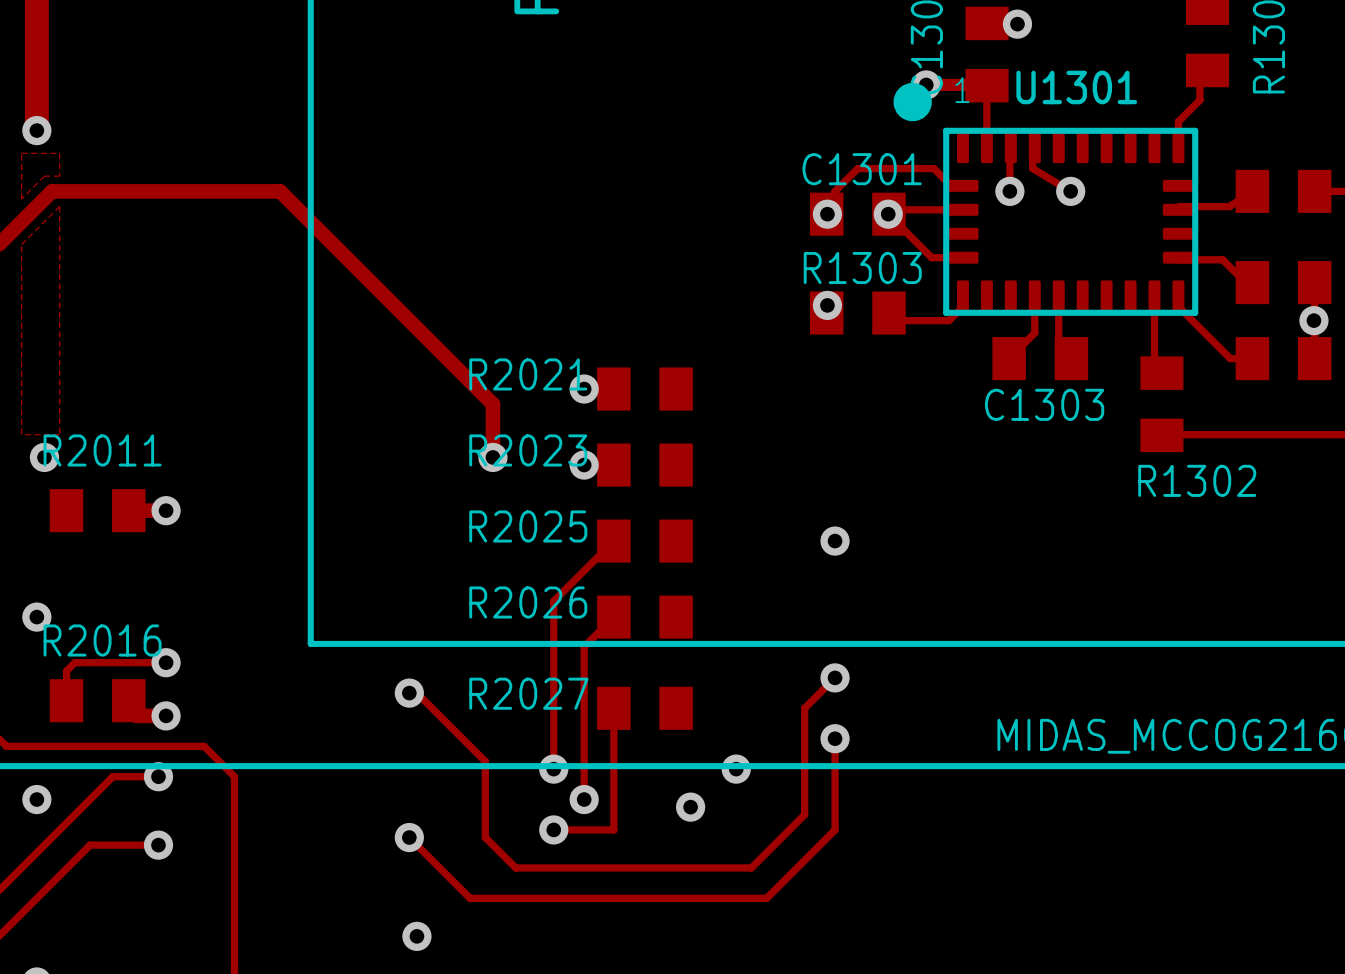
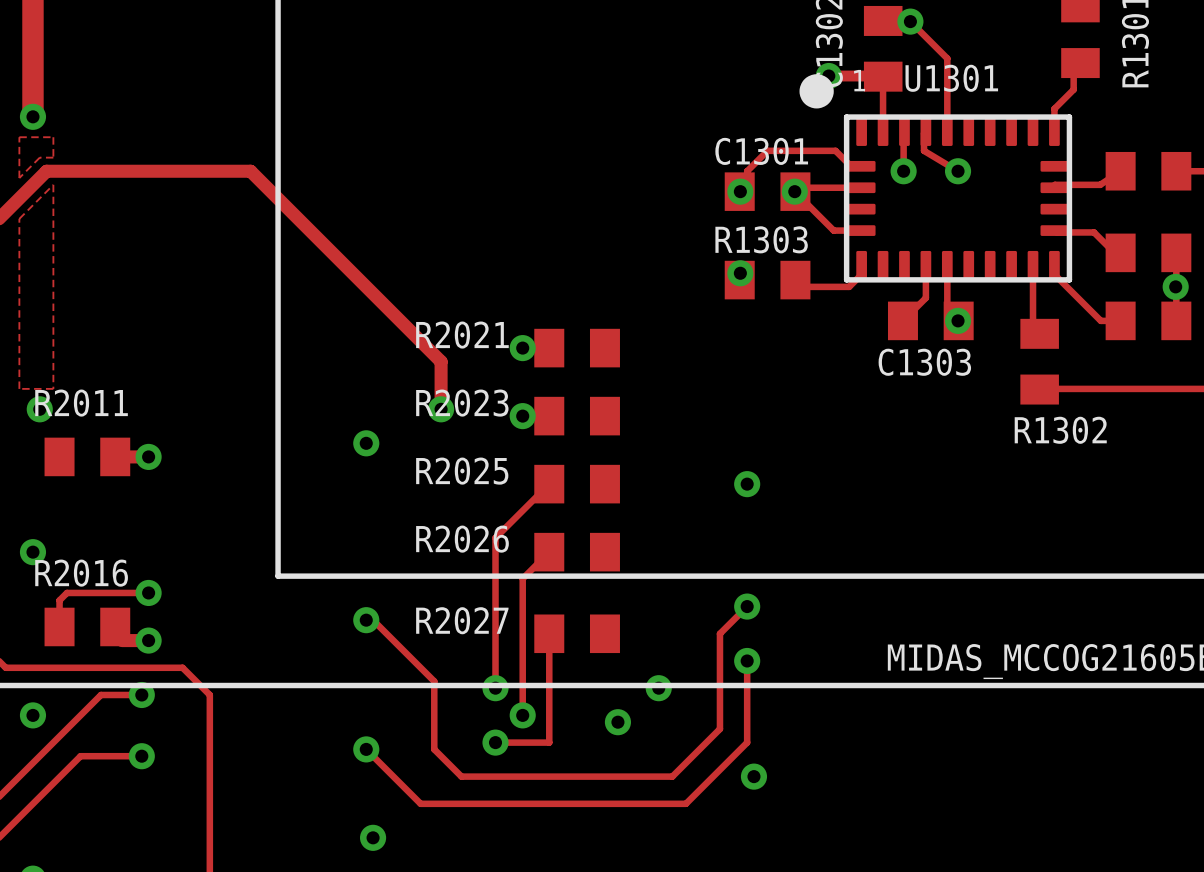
track: none -> (910, 21) (947, 58) (947, 131)
via: none -> (958, 320)
via: none -> (366, 443)
via: none -> (753, 776)

